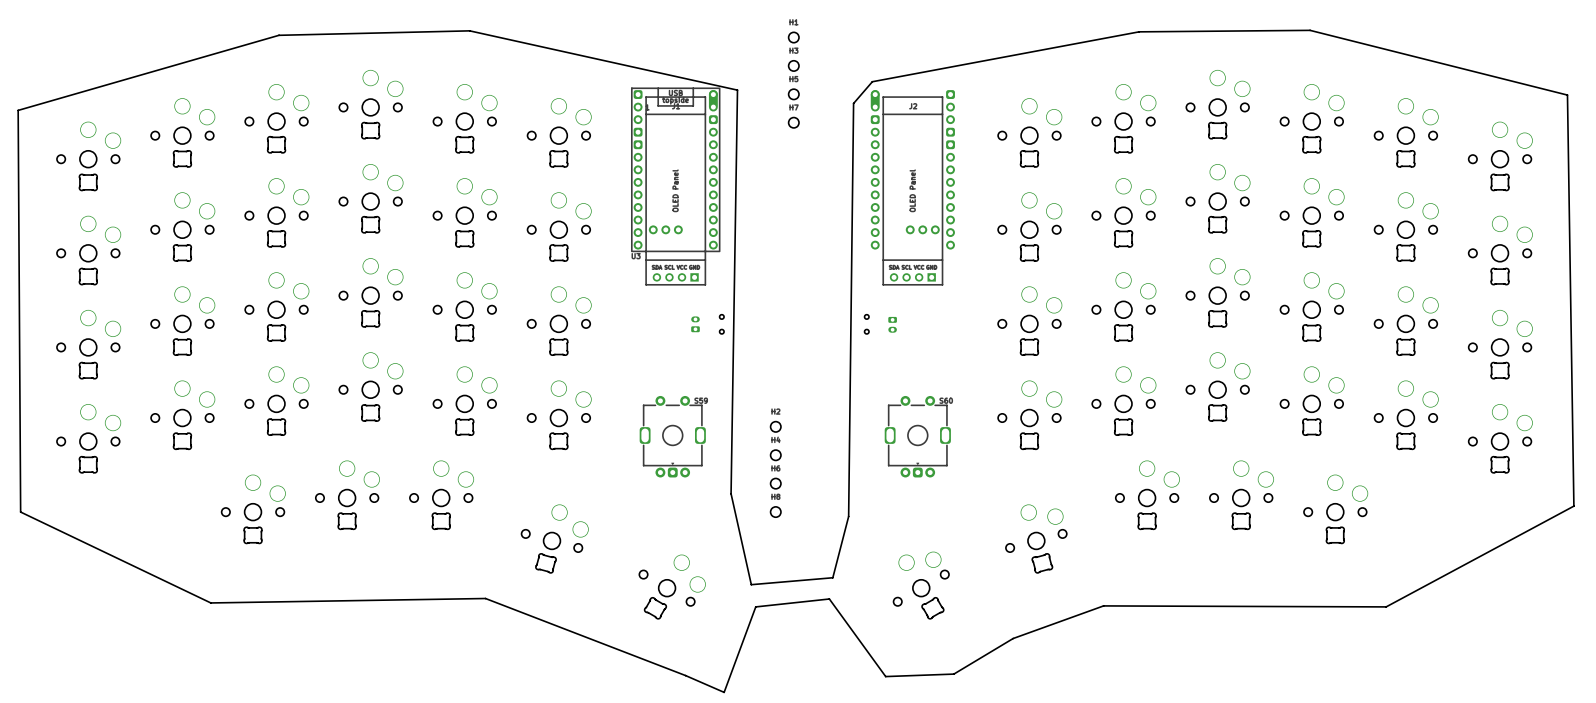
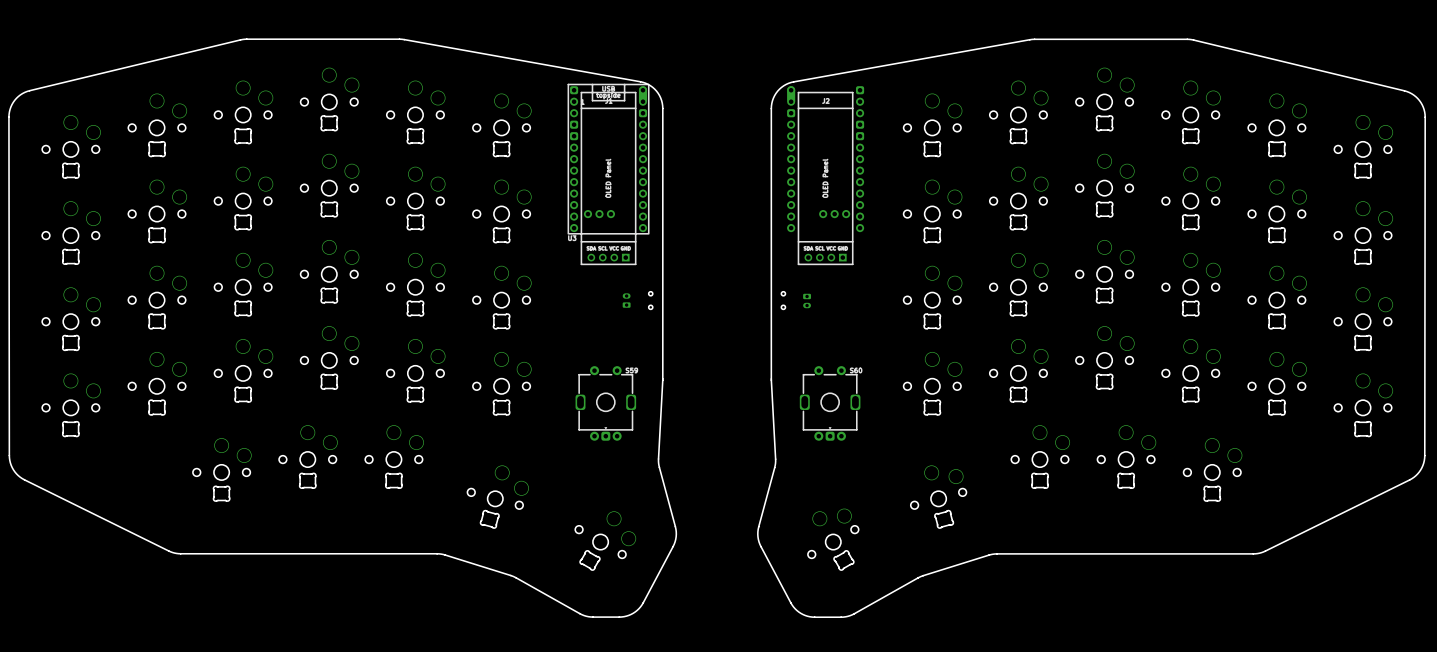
board edge: (1310, 30) (1139, 31) (872, 81) (853, 103) (848, 516) (832, 577) (751, 584) (731, 493) (737, 90) (469, 30) (279, 35) (18, 110) (20, 512) (210, 602) (485, 598) (685, 675) (724, 692) (755, 606) (829, 599) (885, 676) (953, 674) (1013, 638) (1103, 605) (1386, 606) (1573, 506) (1567, 95) (1310, 30) -> none
part: (793, 37) -> none
board edge: none -> (246, 39) (401, 39) (640, 81) (650, 85) (658, 93) (662, 108) (662, 378) (658, 461) (676, 534) (673, 546) (643, 602) (635, 611) (621, 616) (586, 616) (513, 576) (441, 554) (174, 553) (24, 479) (13, 469) (9, 455) (8, 117) (11, 104) (18, 96) (29, 90) (246, 39)
board edge: none -> (1034, 39) (1192, 39) (1404, 90) (1417, 98) (1423, 107) (1425, 117) (1424, 455) (1422, 465) (1417, 473) (1409, 479) (1259, 553) (992, 554) (920, 576) (850, 615) (814, 617) (805, 615) (796, 610) (790, 602) (760, 546) (757, 534) (775, 461) (771, 379) (771, 108) (773, 98) (781, 87) (793, 81) (1034, 39)
part: (793, 65) -> none
part: (793, 94) -> none
part: (793, 122) -> none
part: (775, 426) -> none
part: (775, 455) -> none
part: (775, 483) -> none
part: (775, 512) -> none

